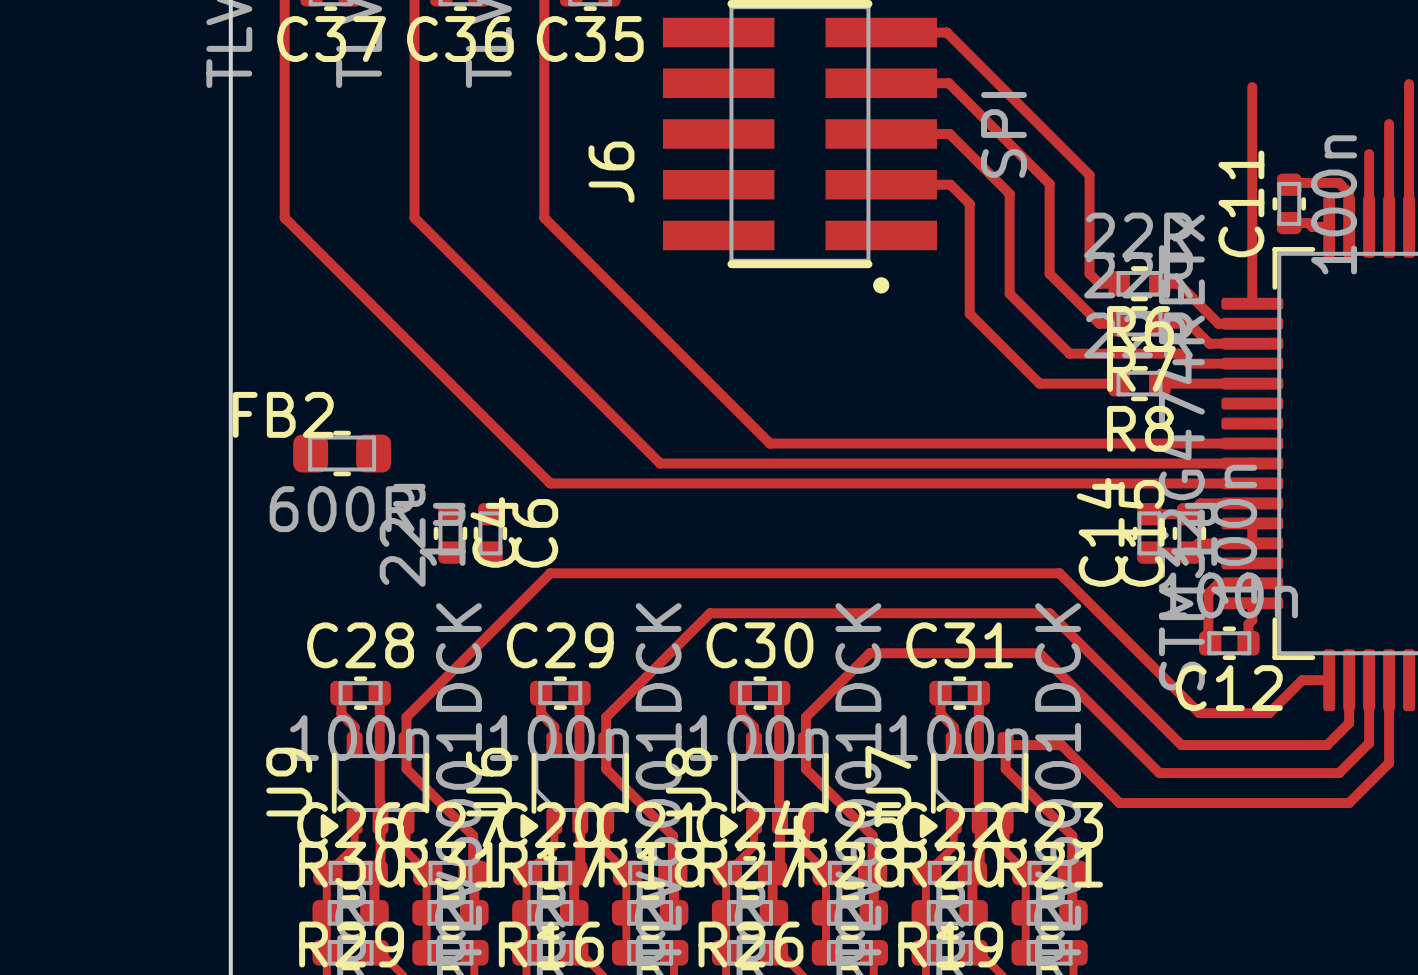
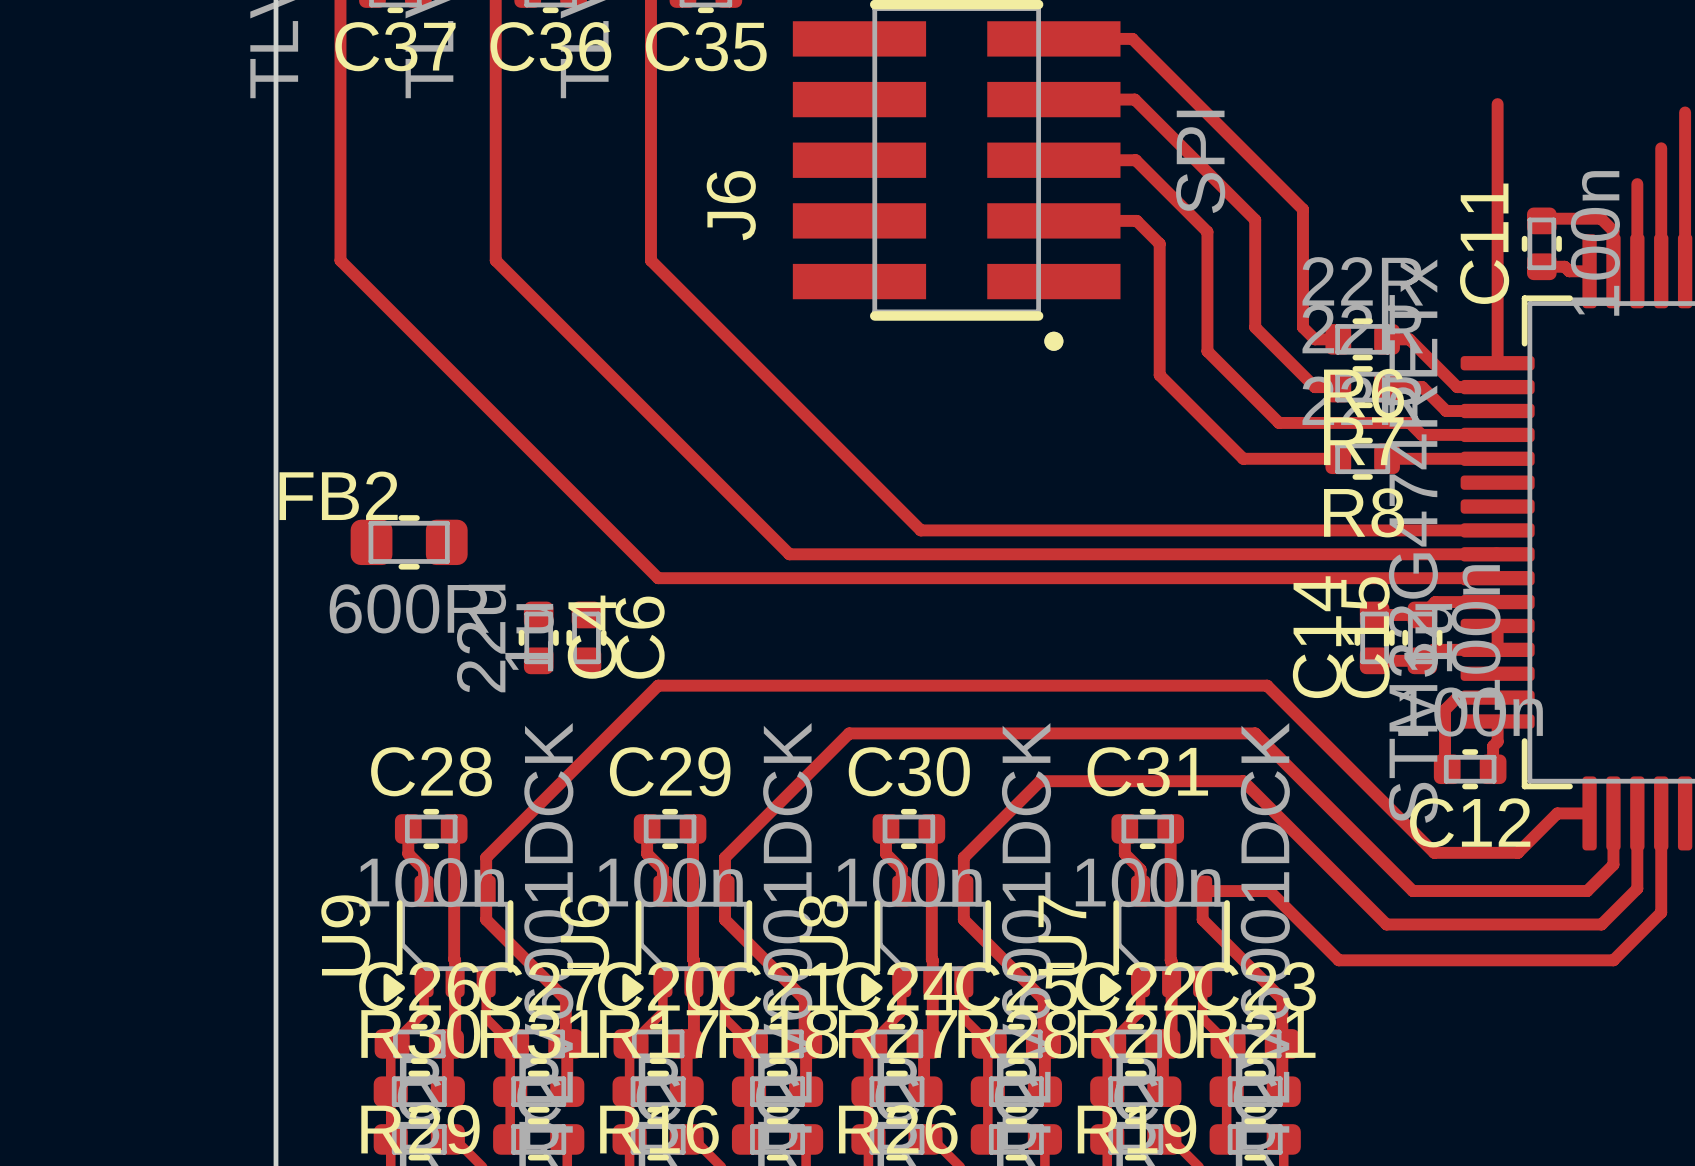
top track: (1409, 84) (1409, 94) -> none

